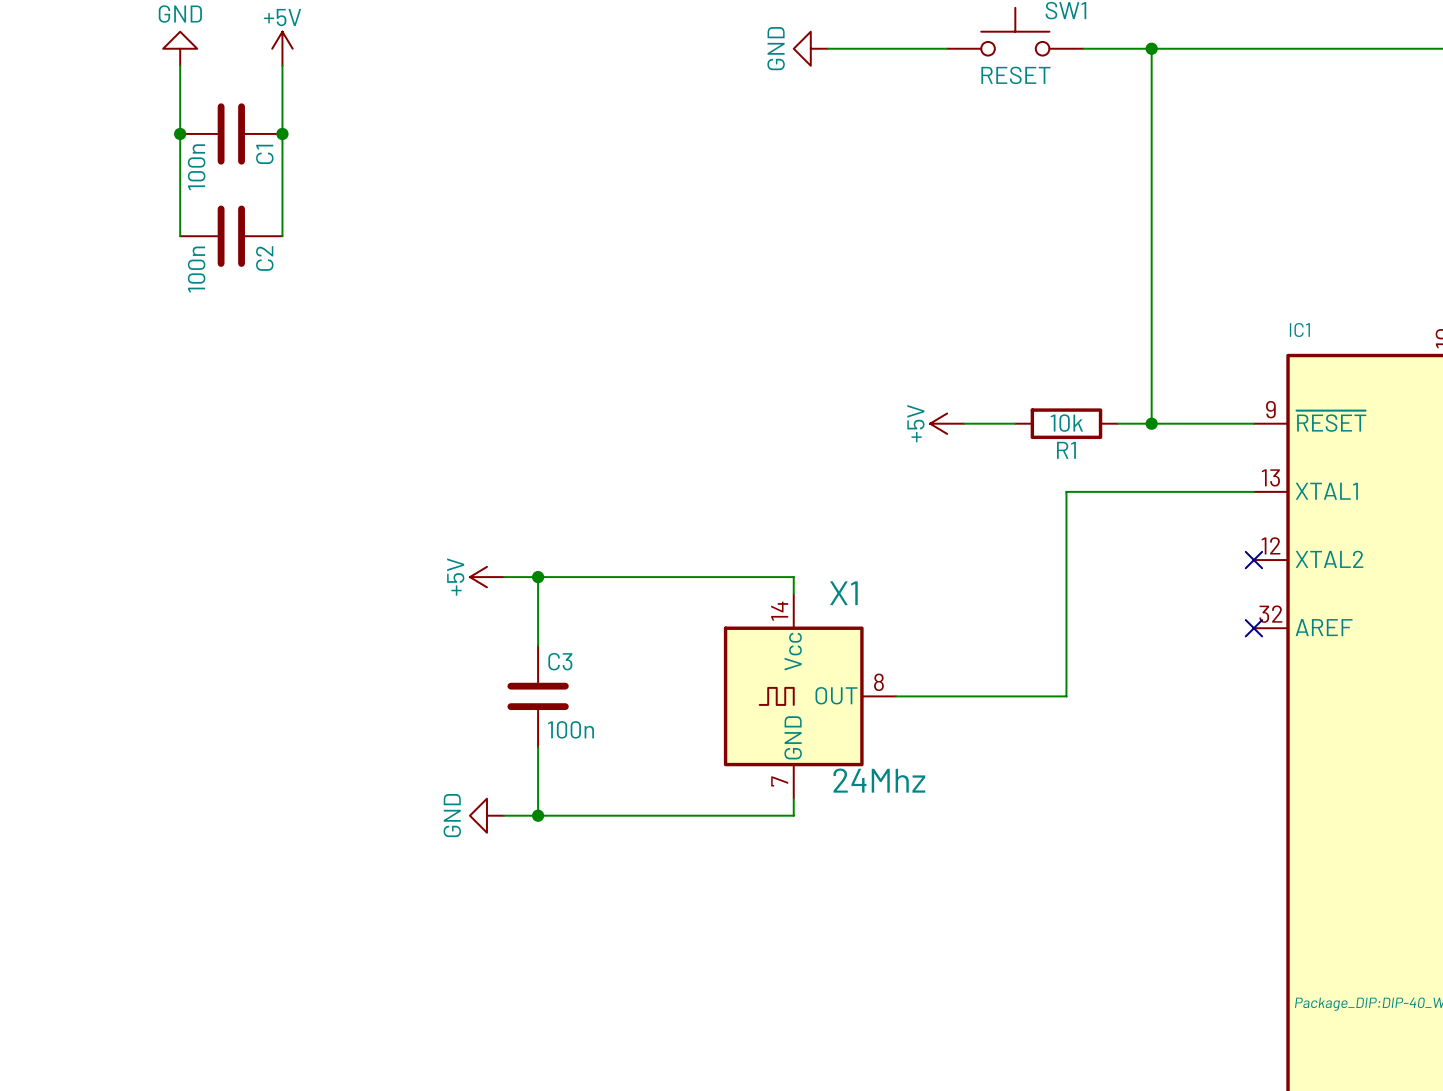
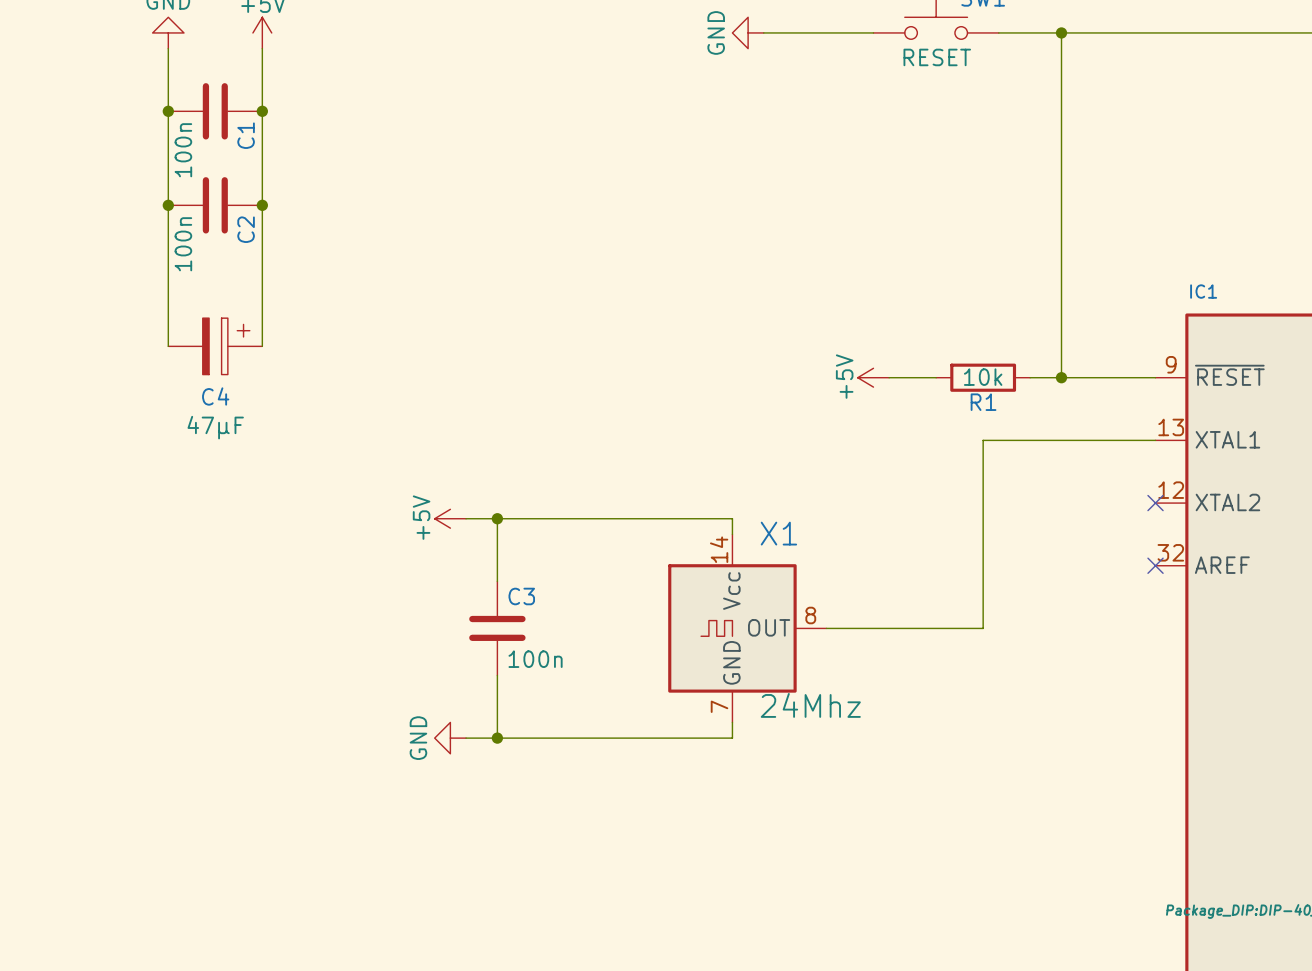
wire: none -> (168, 205) (168, 346)
junction: none -> (168, 205)
wire: none -> (262, 205) (262, 346)
junction: none -> (262, 205)
C4: none -> 47µF (215, 346)

